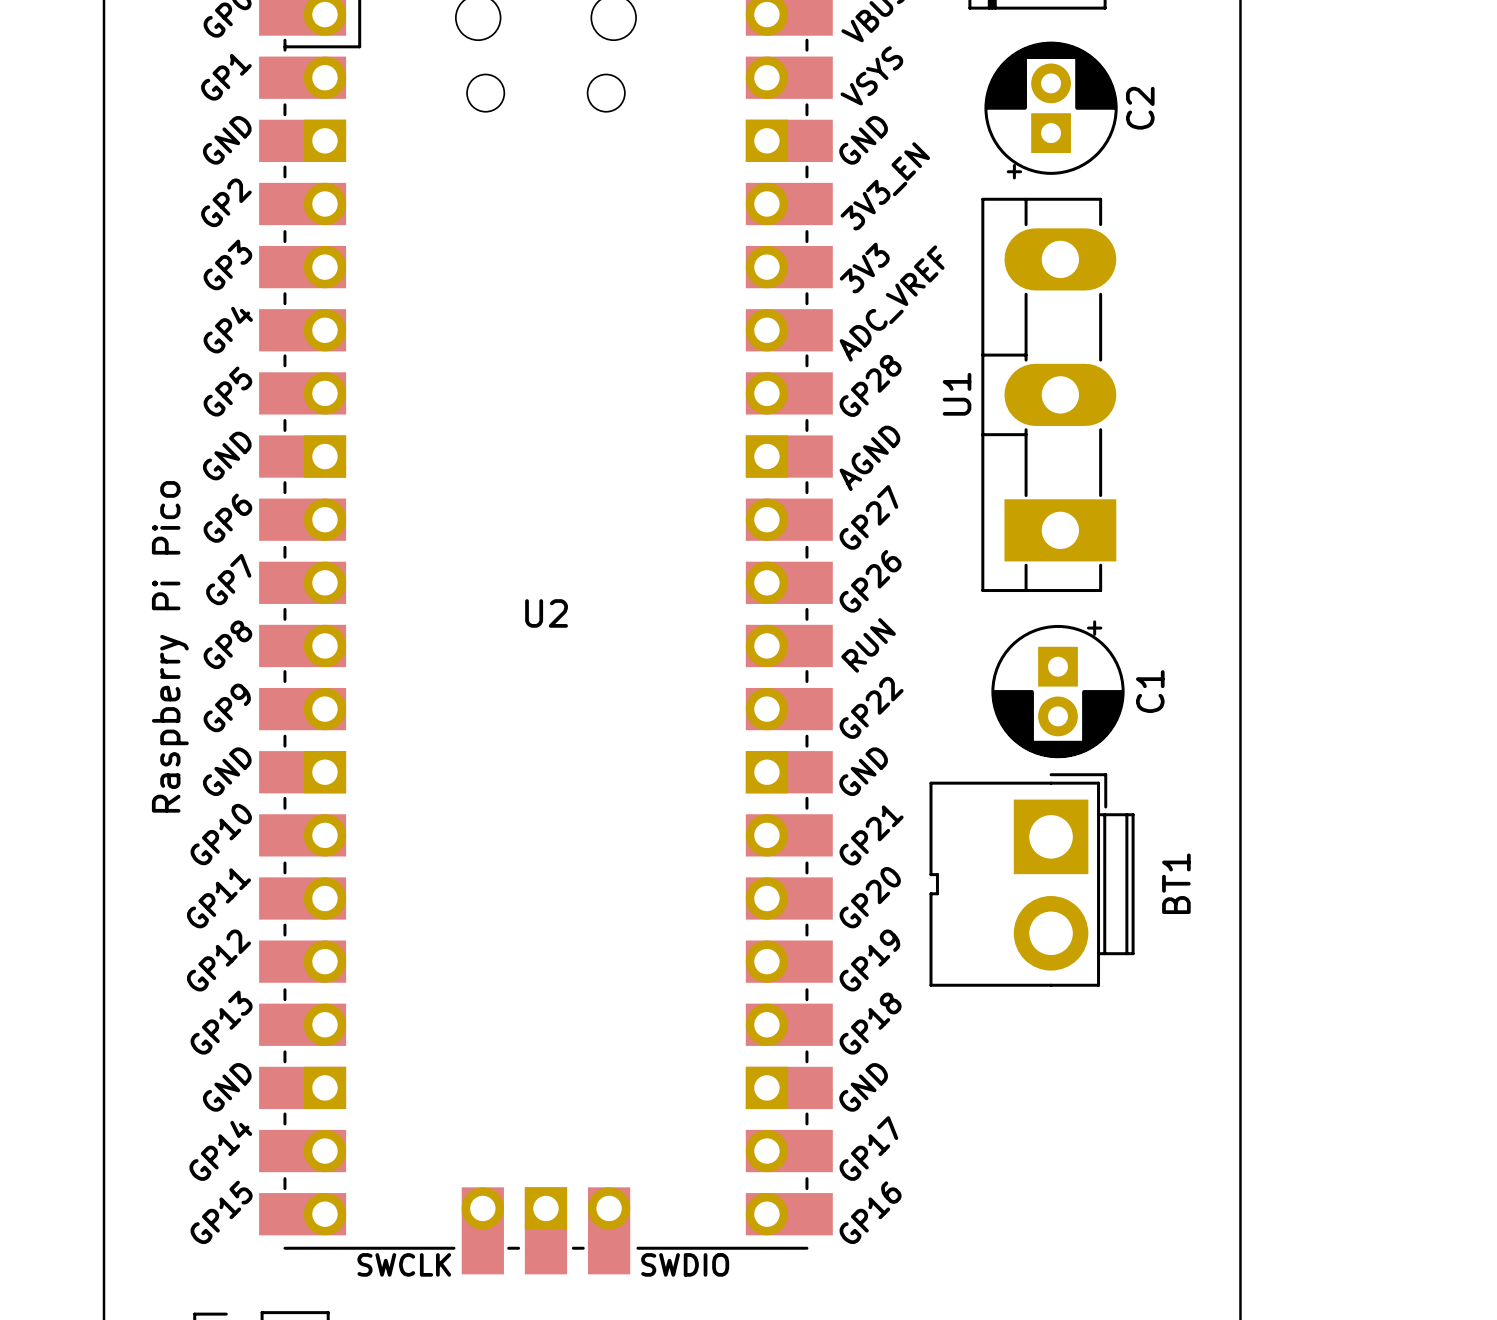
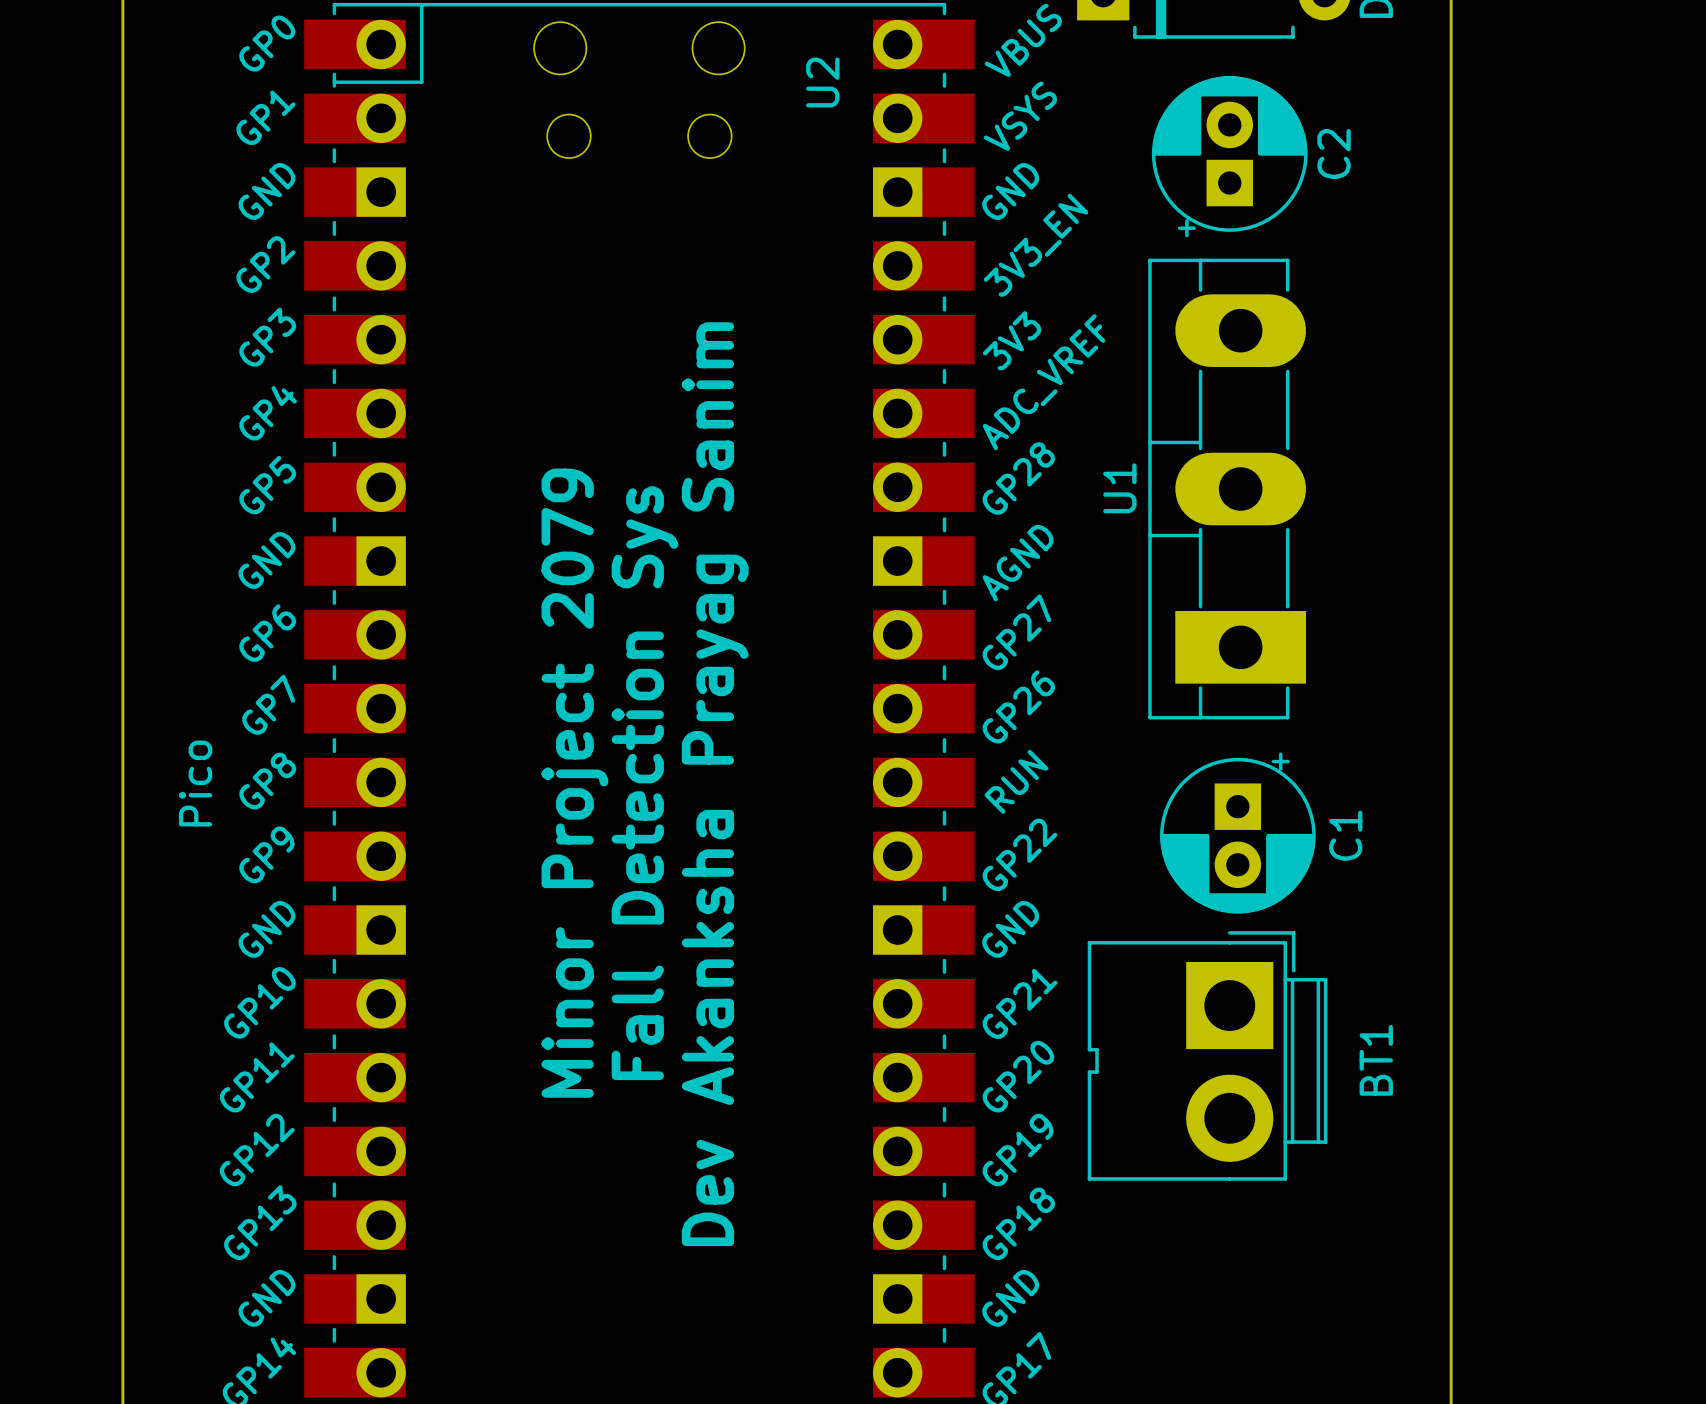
U2 name rotation: 0° (546, 613) -> 90° counterclockwise (822, 82)
U2 name position: U2 (546, 613) -> U2 (822, 82)
U2 value: Raspberry Pi Pico (170, 646) -> Pico (195, 783)
text: none -> Minor Project 2079 (574, 783)
text: none -> Fall Detection Sys (645, 783)
text: none -> Dev Akanksha Prayag Sanim (715, 784)

